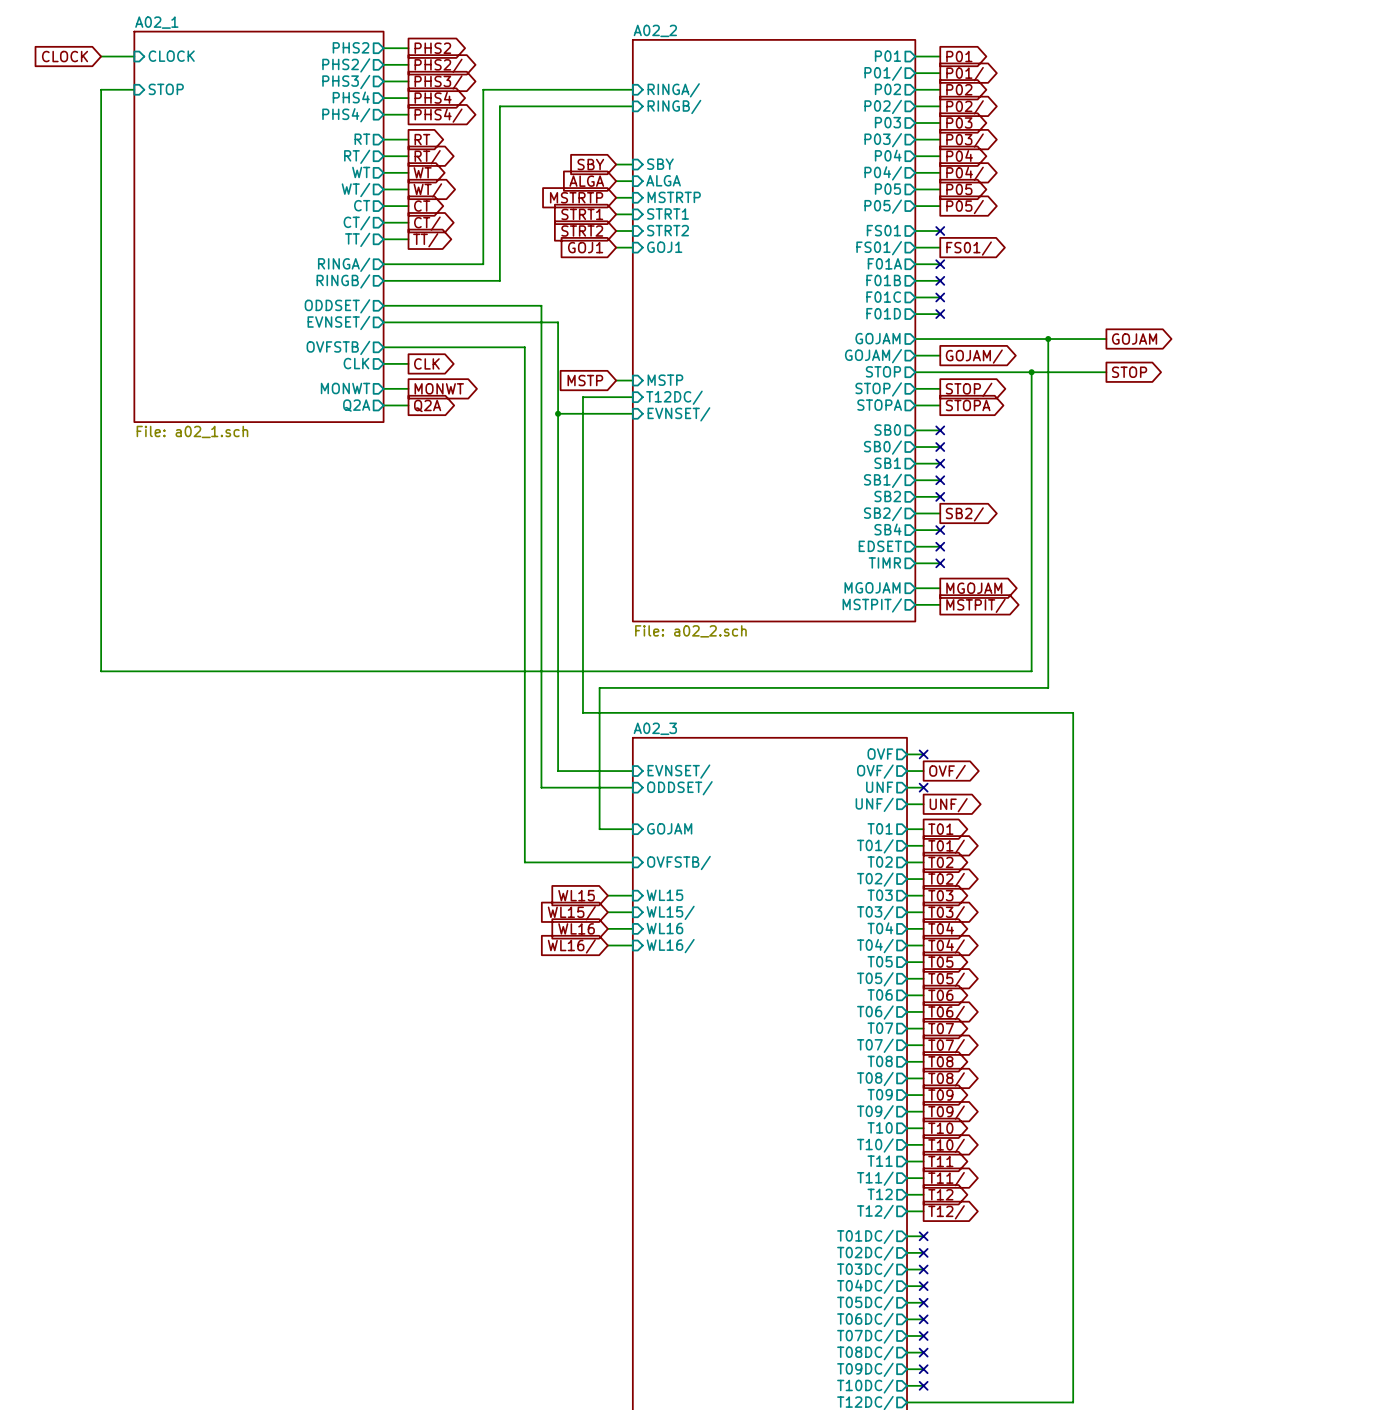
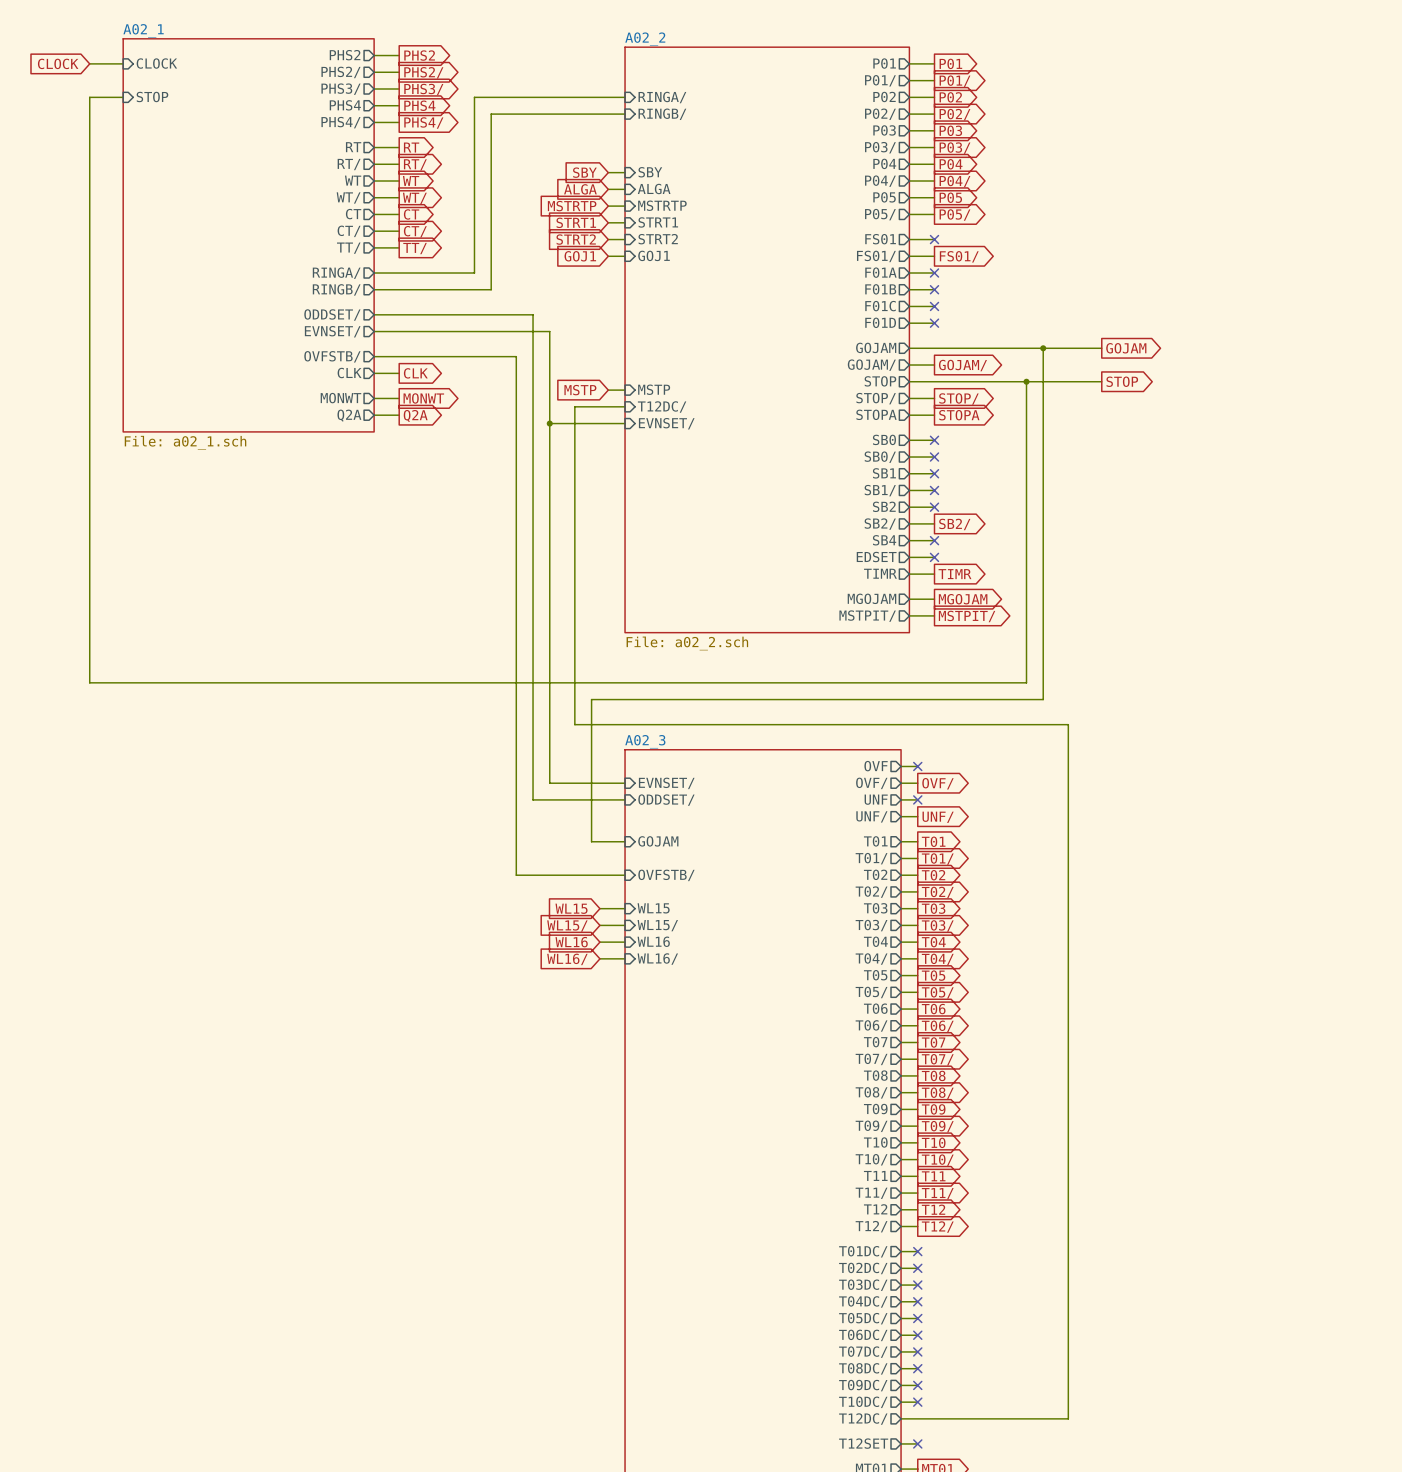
no-connect mark: (940, 563) -> none
global label: none -> TIMR (954, 574)

